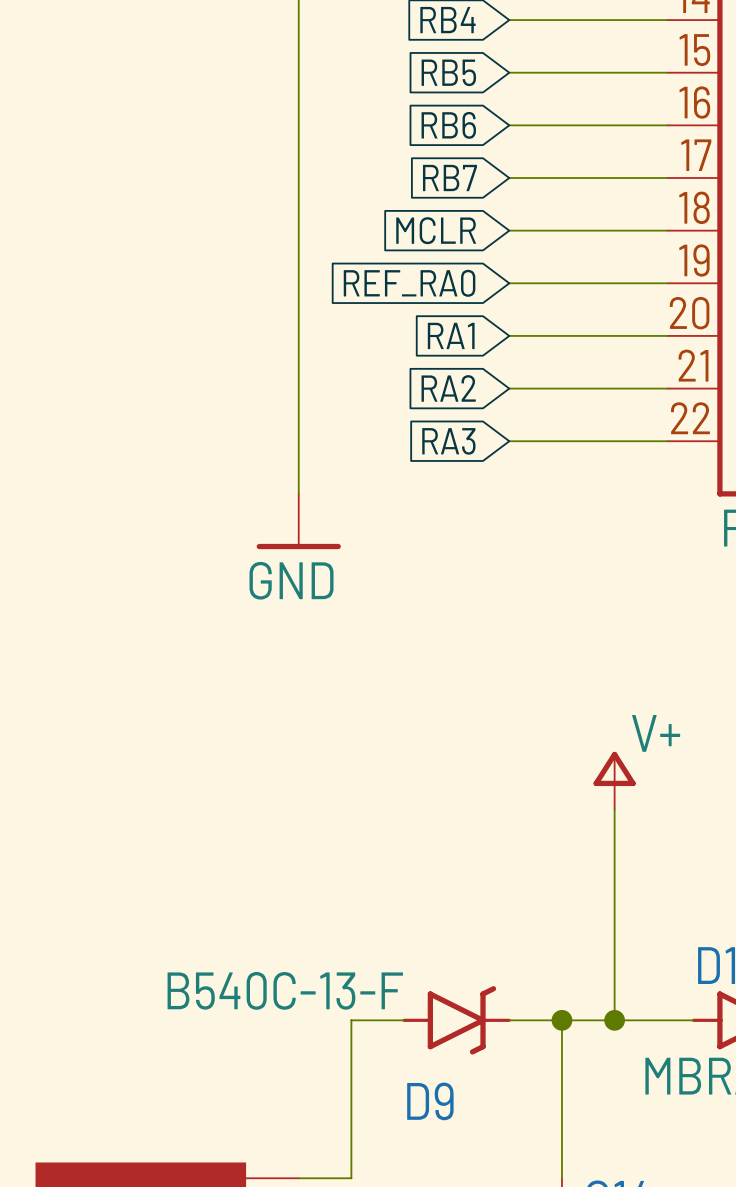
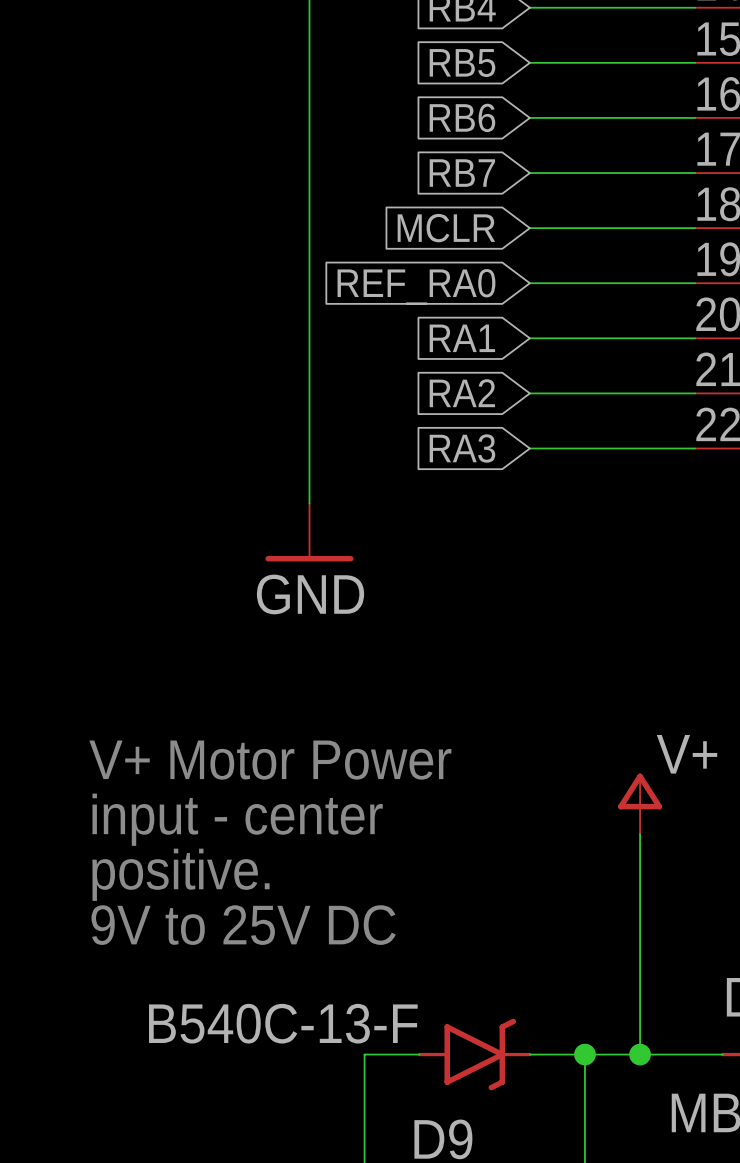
text: none -> V+ Motor Power (270, 760)
text: none -> input - center (237, 819)
text: none -> positive. (180, 874)
text: none -> 9V to 25V DC (243, 925)

